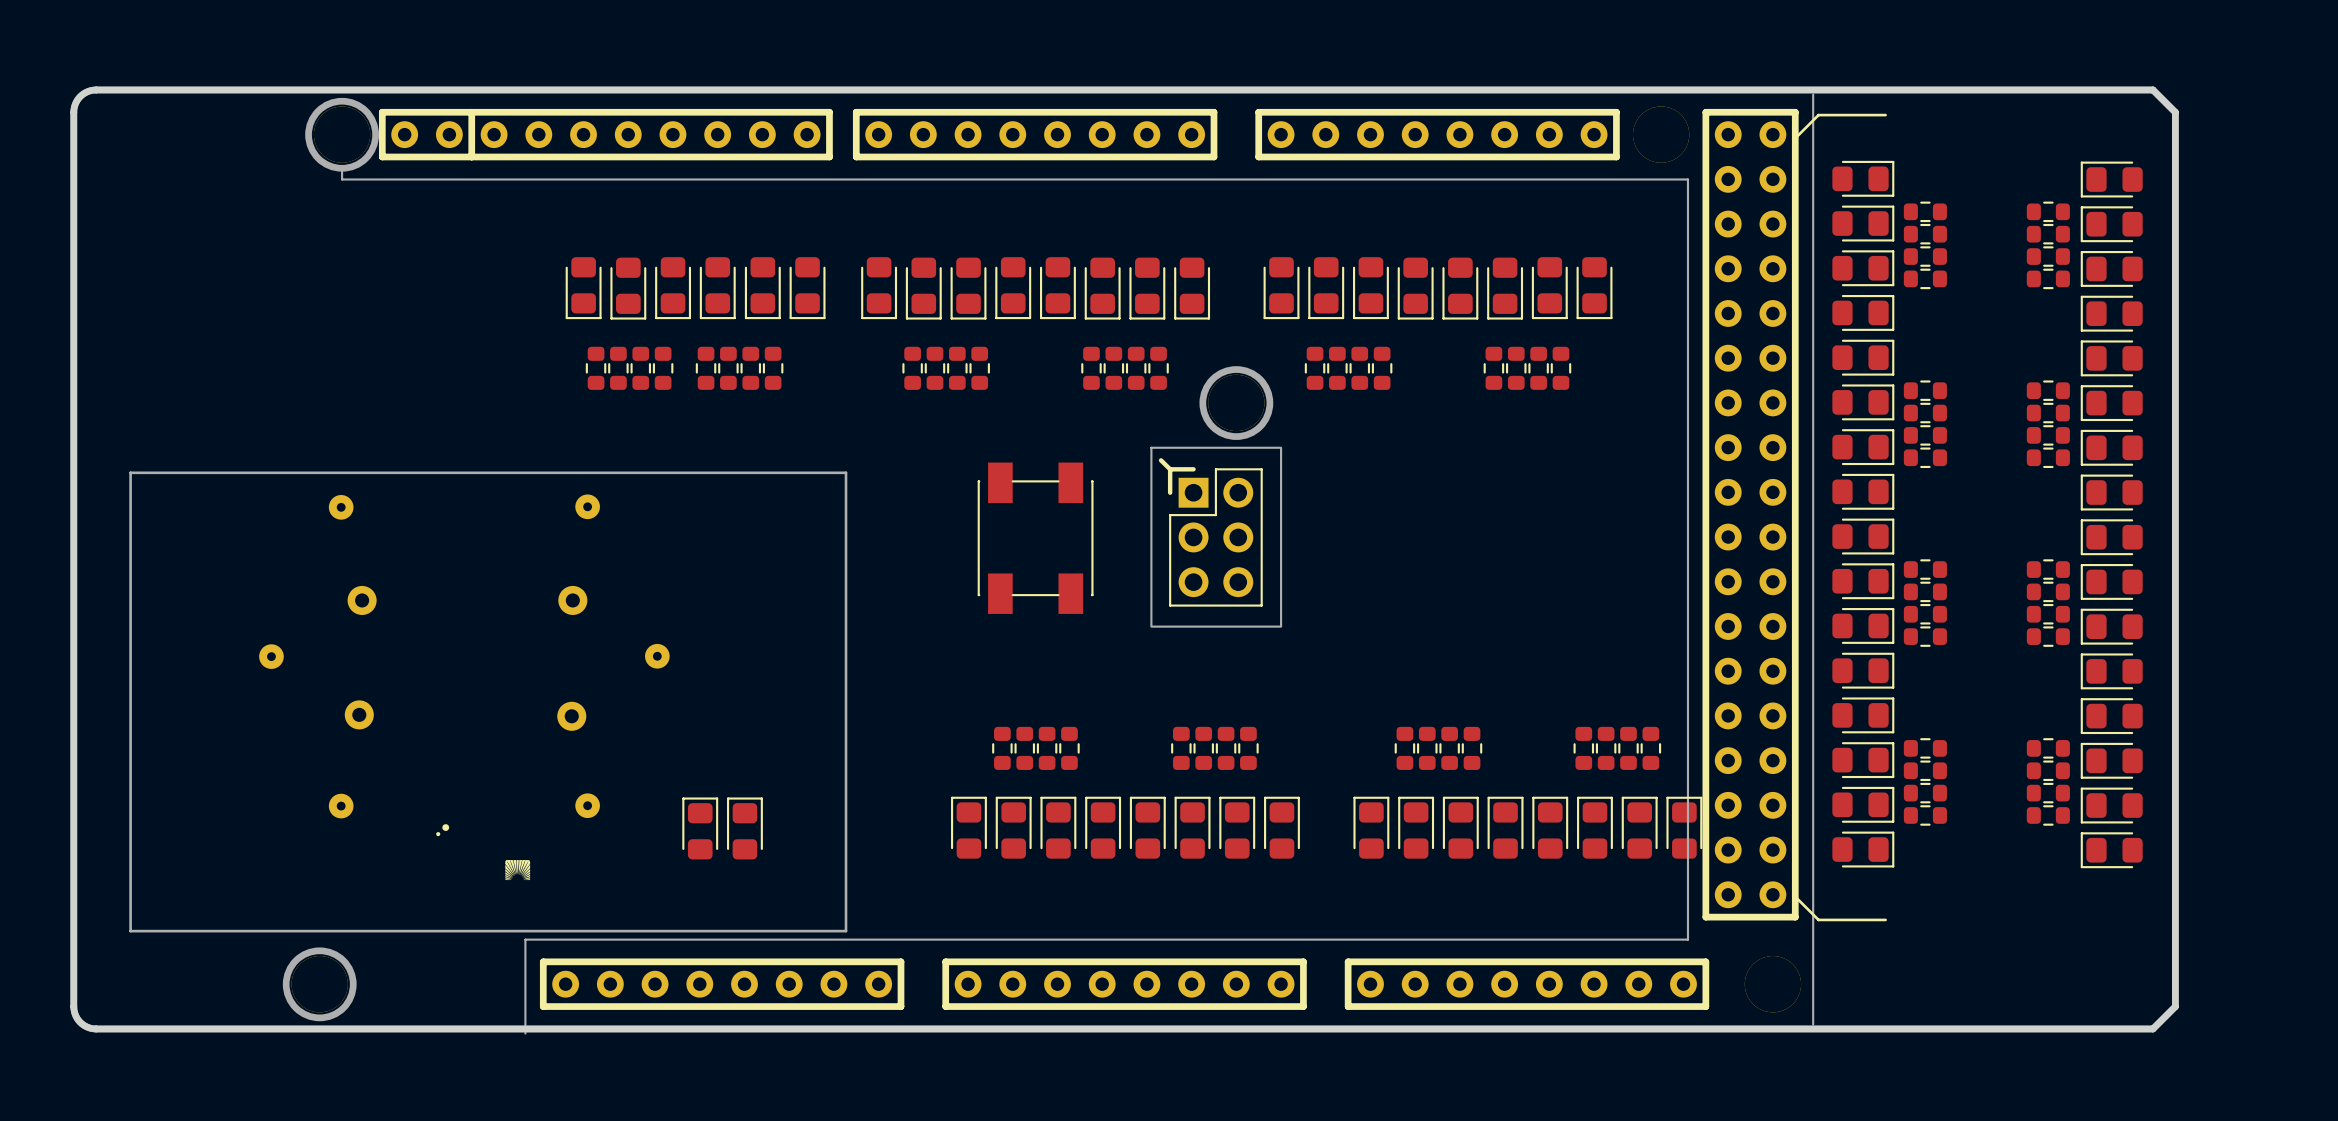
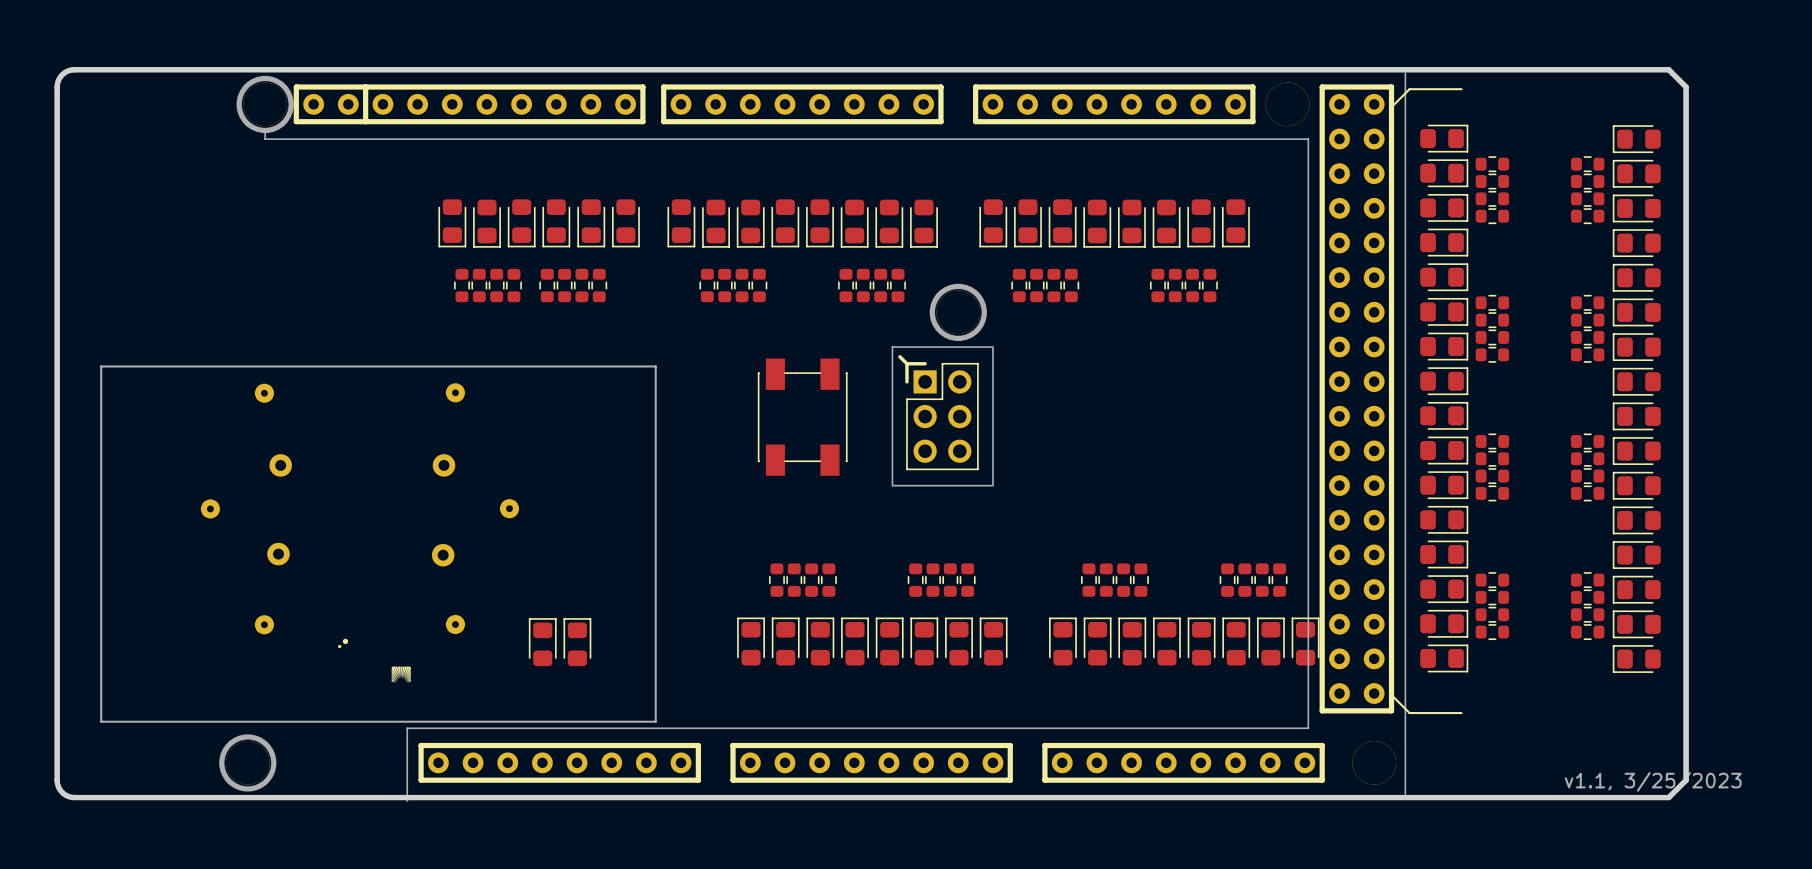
text: none -> v1.1, 3/25/2023 (1653, 781)

